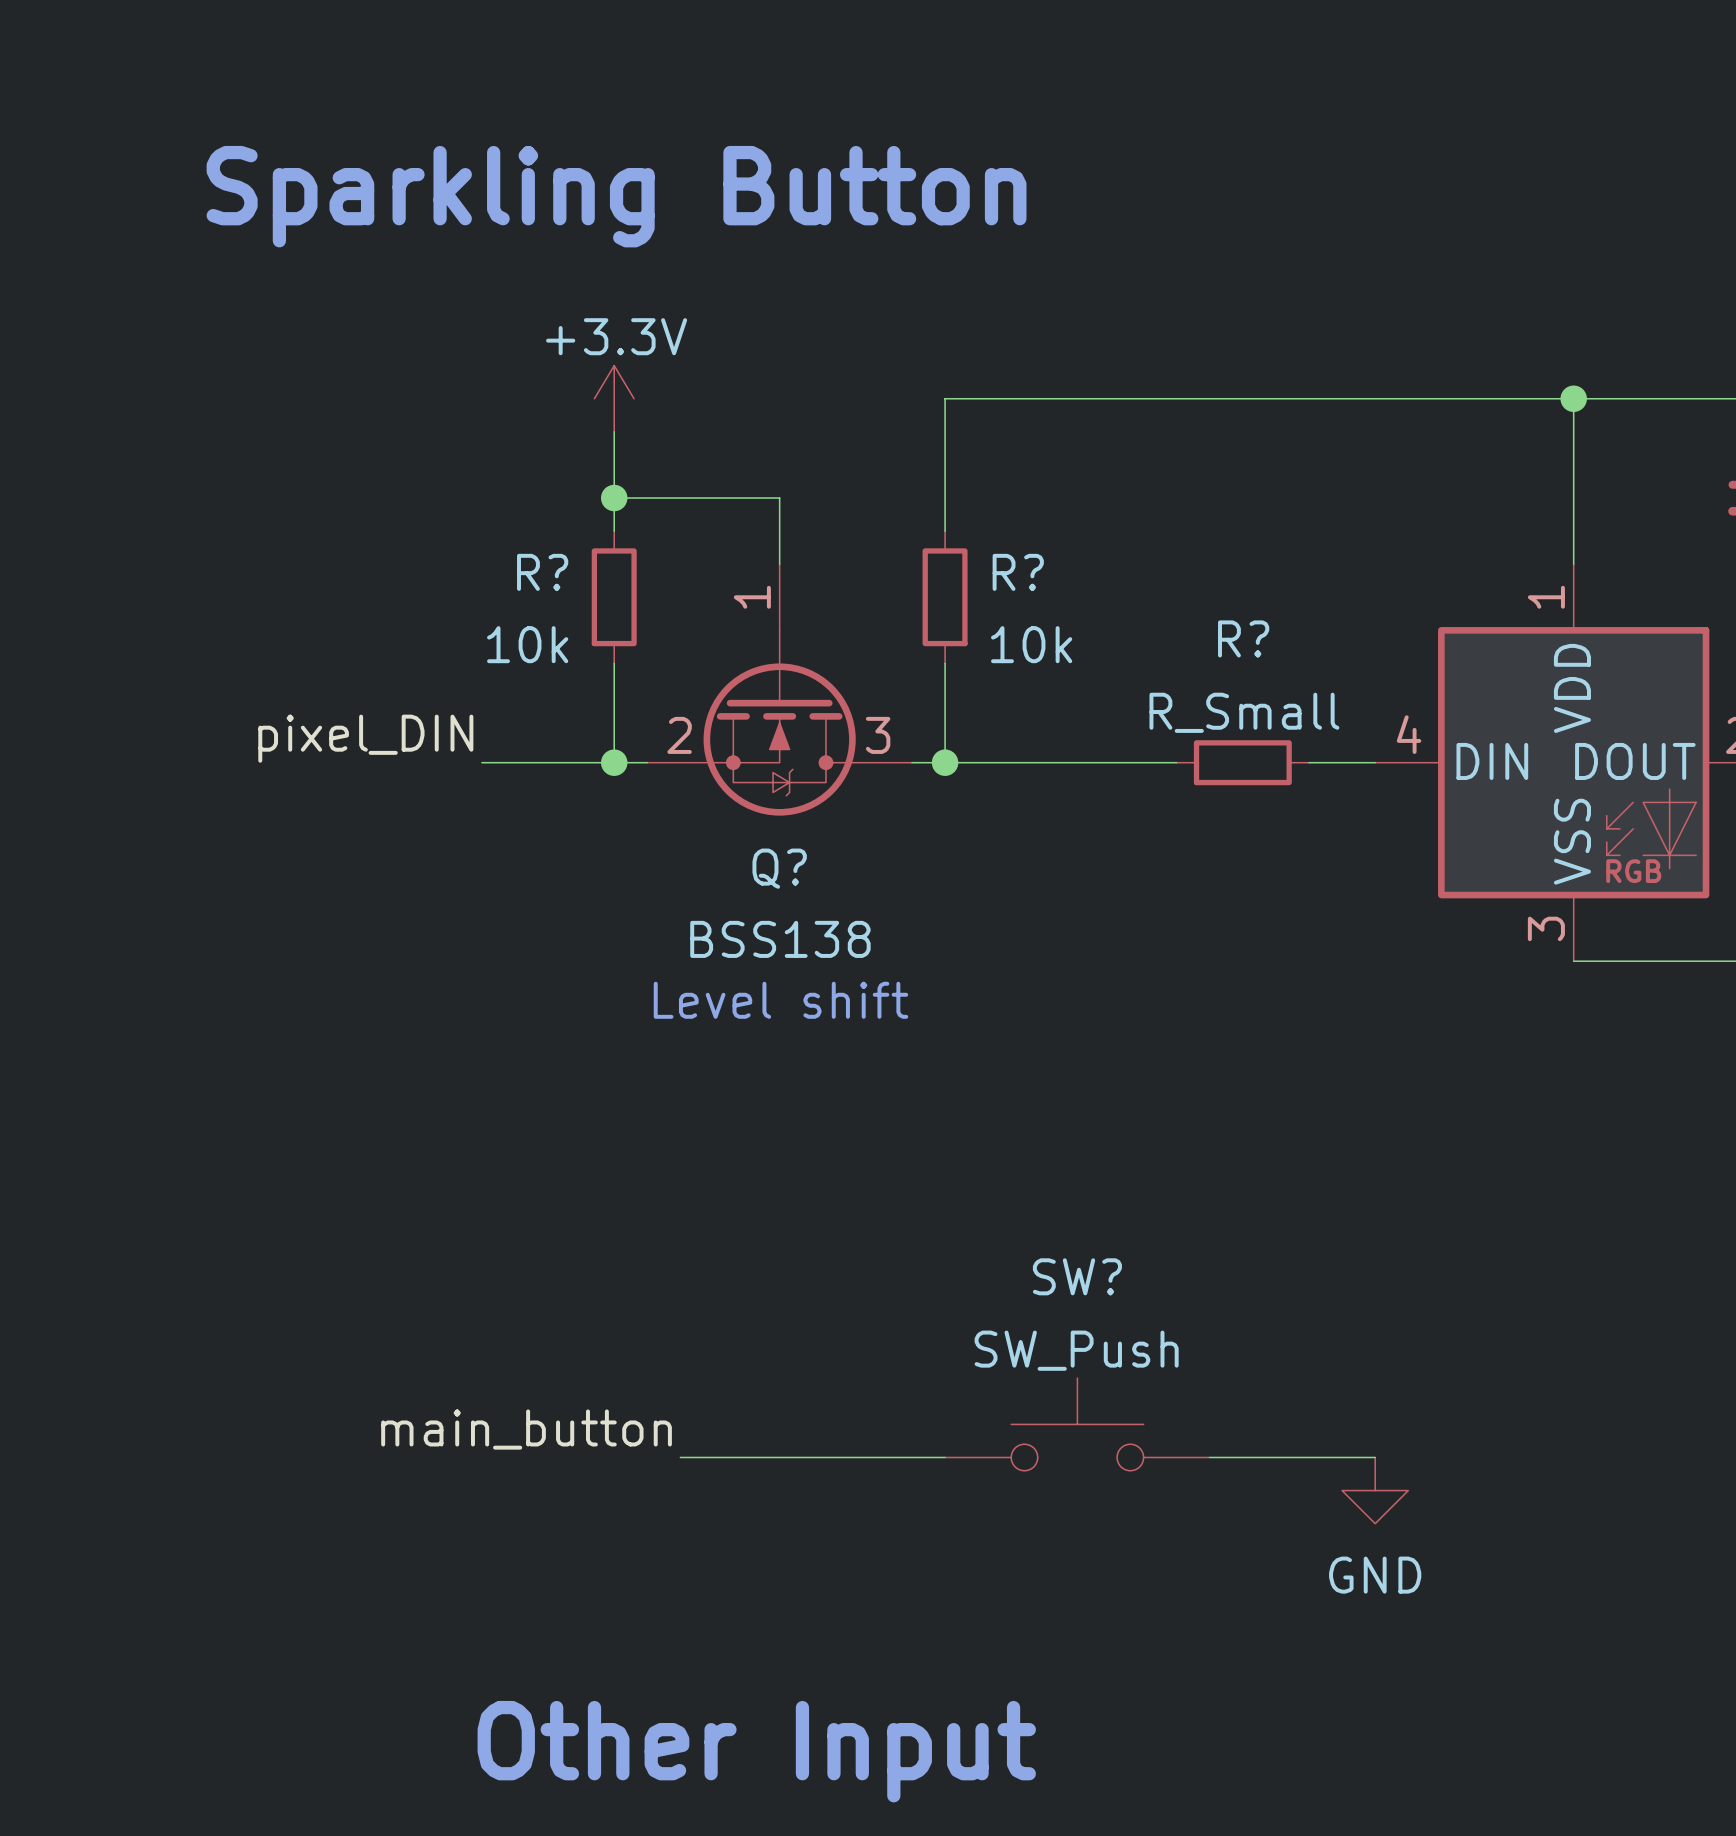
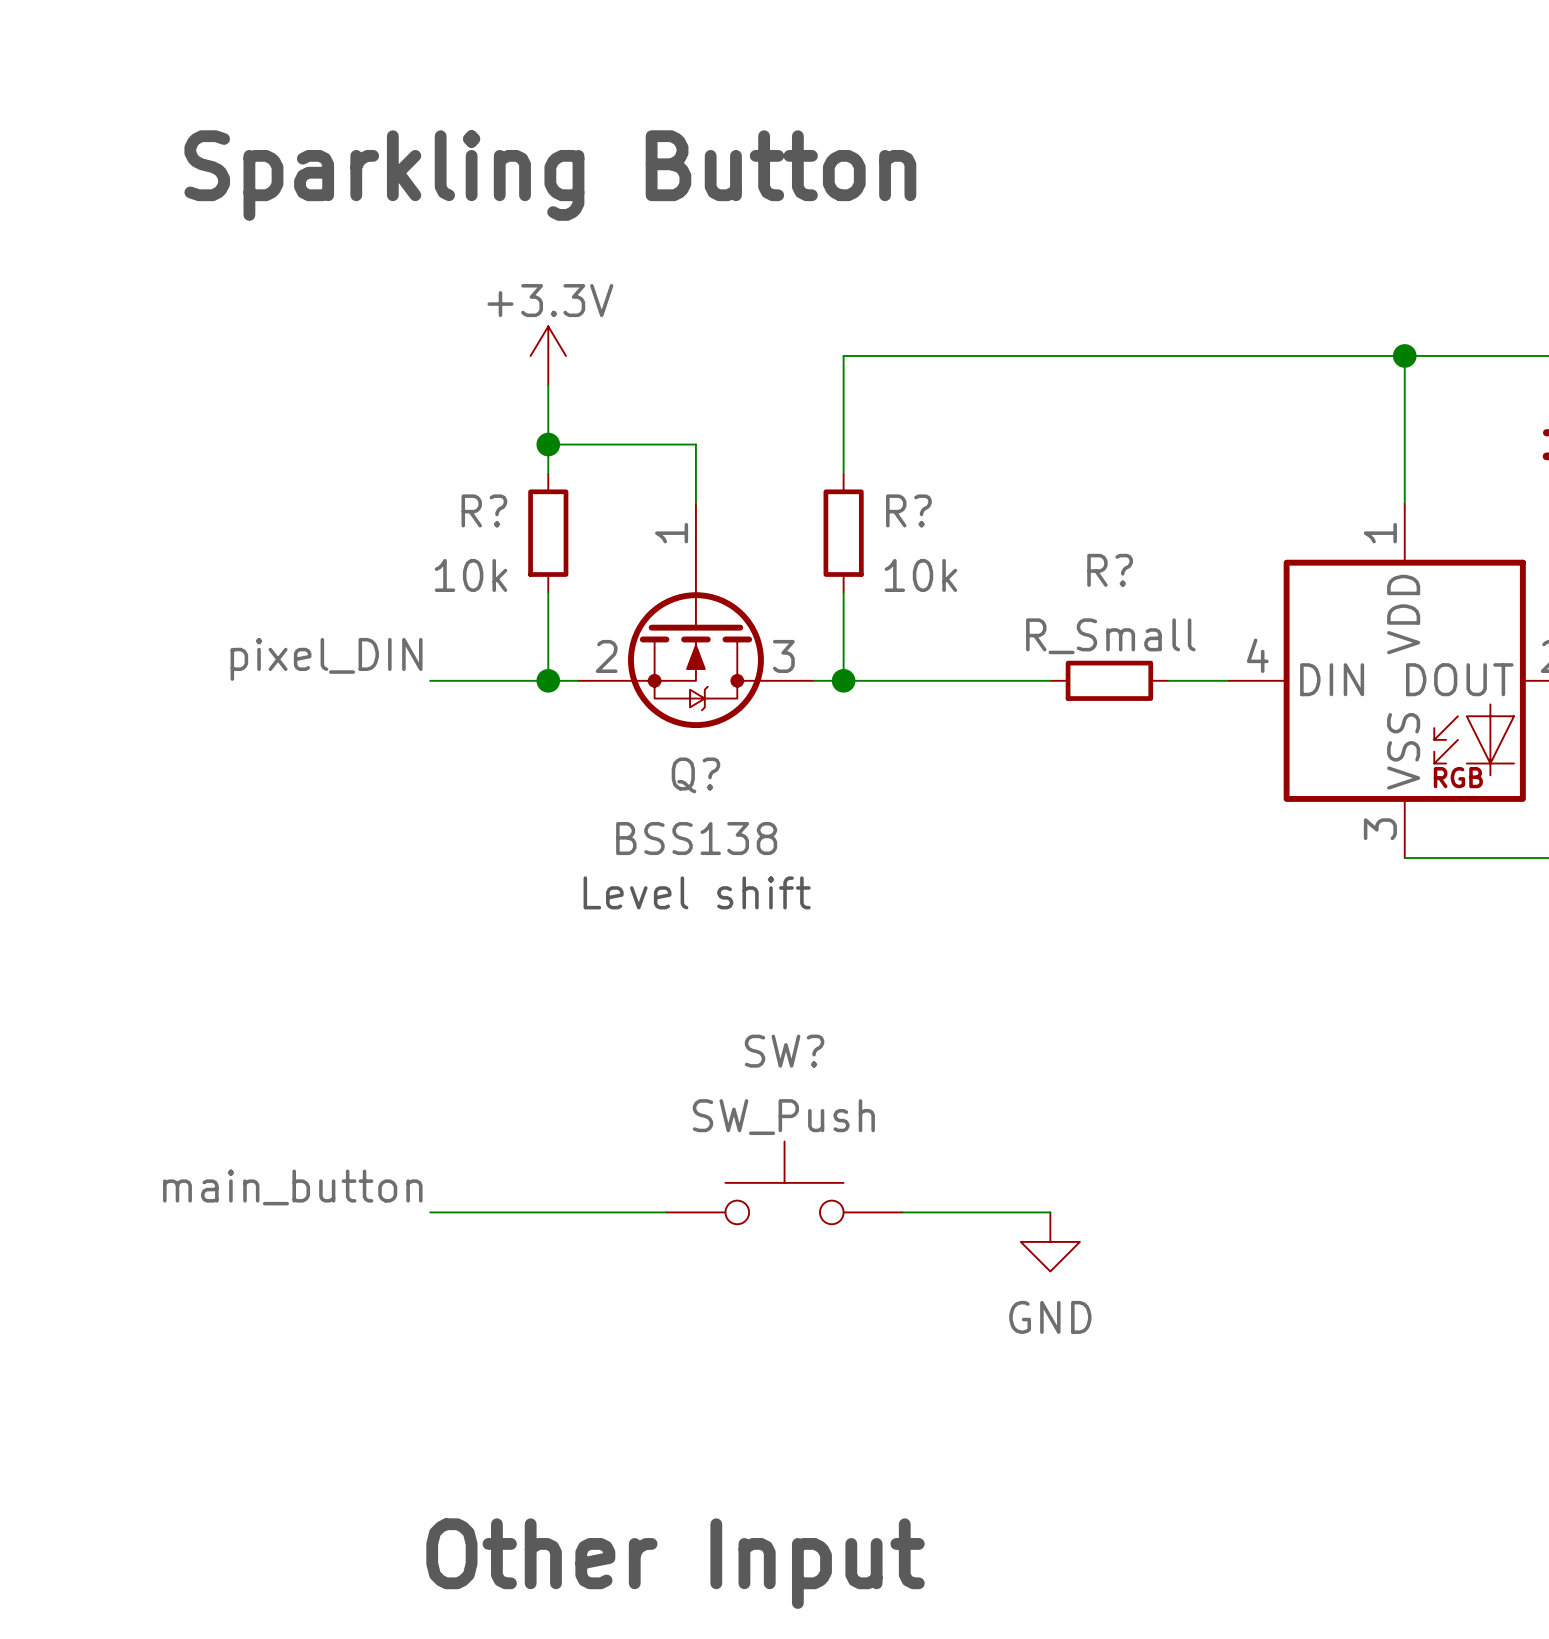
SW? position: (1077, 1424) -> (784, 1182)
label position: main_button (526, 1429) -> main_button (292, 1187)
wire: (680, 1457) (945, 1457) -> (430, 1212) (666, 1212)
wire: (1209, 1457) (1375, 1457) -> (902, 1212) (1050, 1212)
power symbol position: GND (1375, 1490) -> GND (1050, 1241)

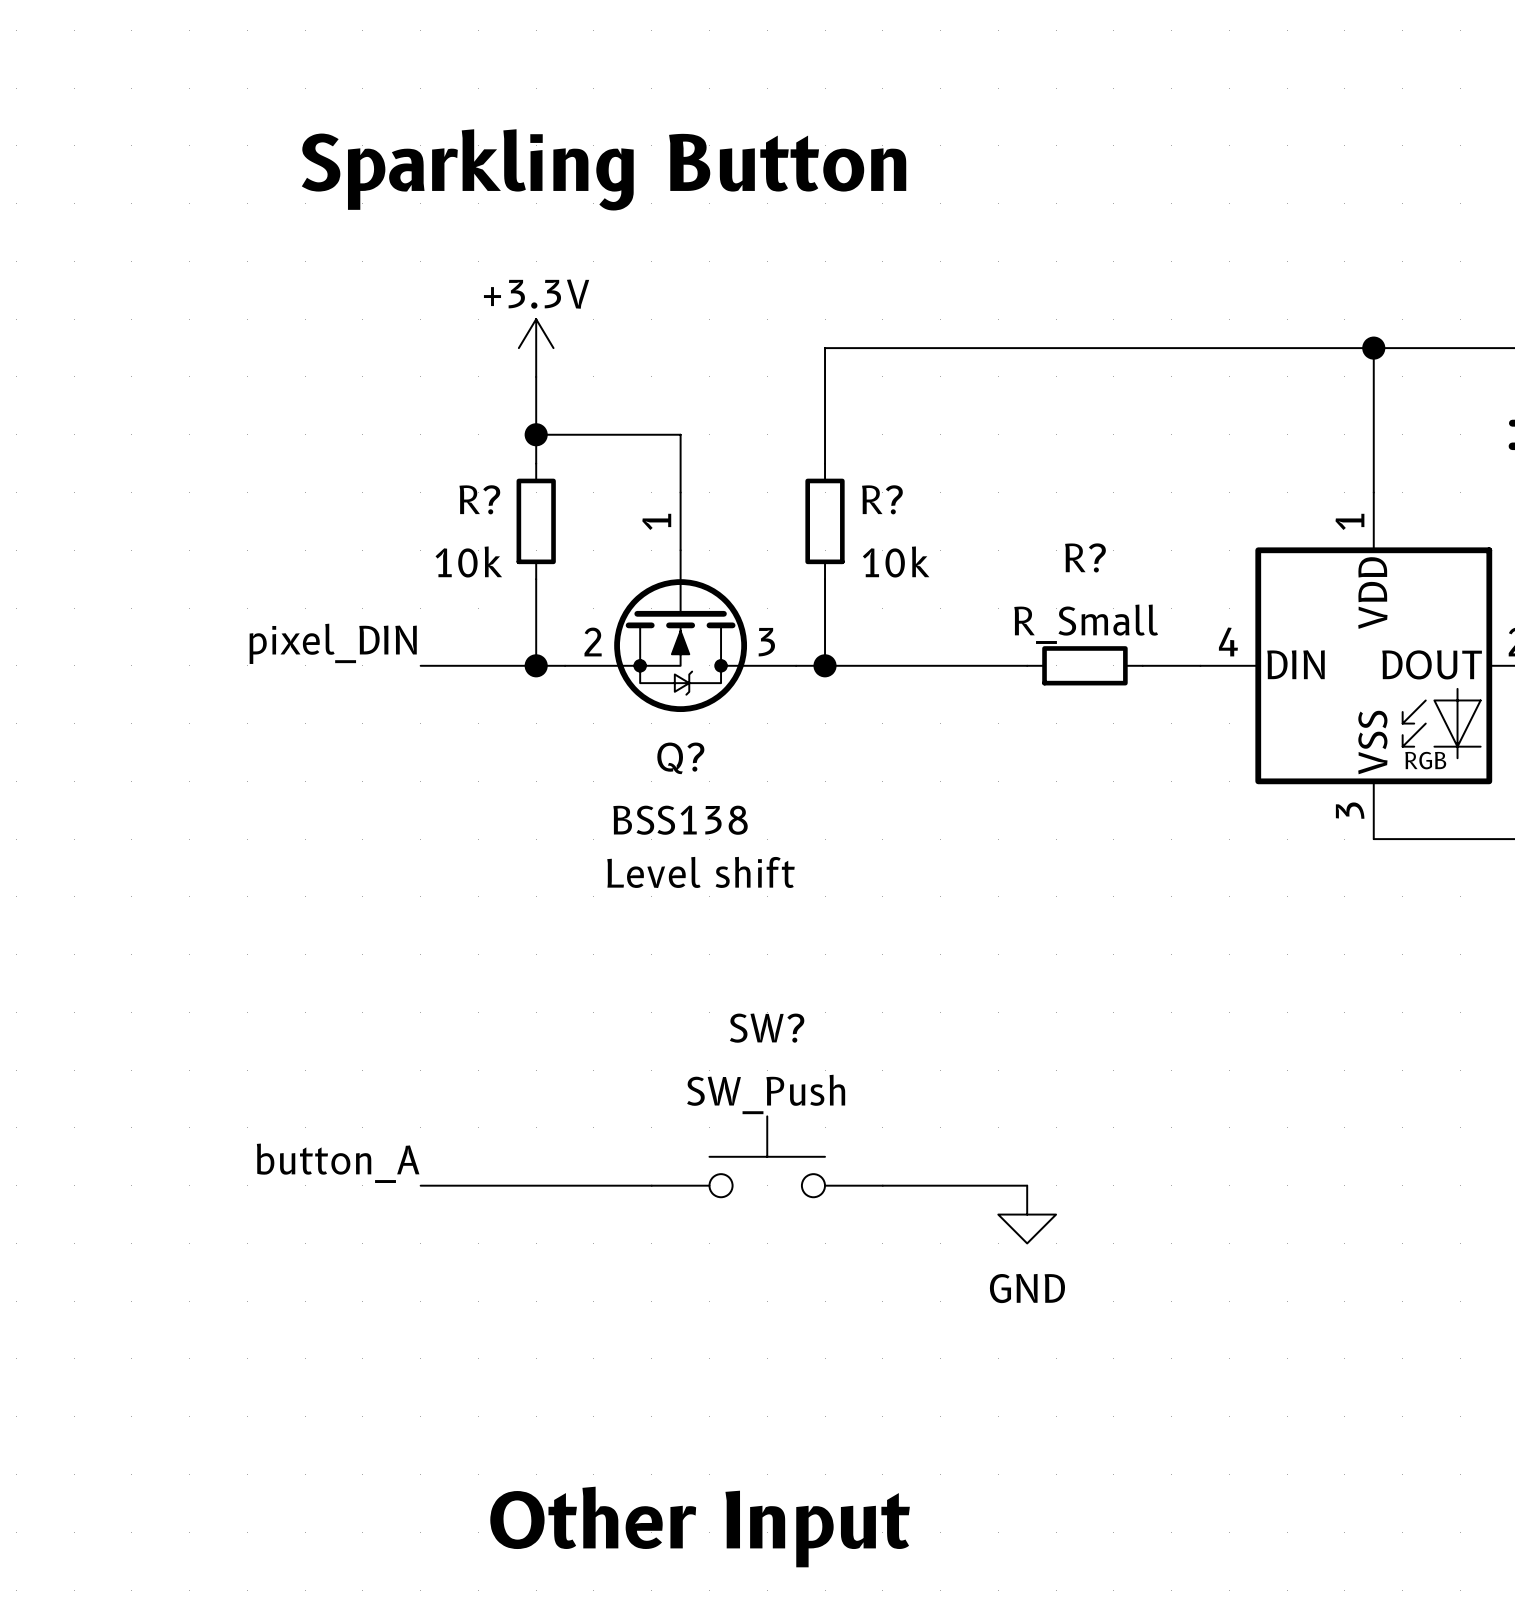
label: main_button (292, 1187) -> button_A (338, 1163)

